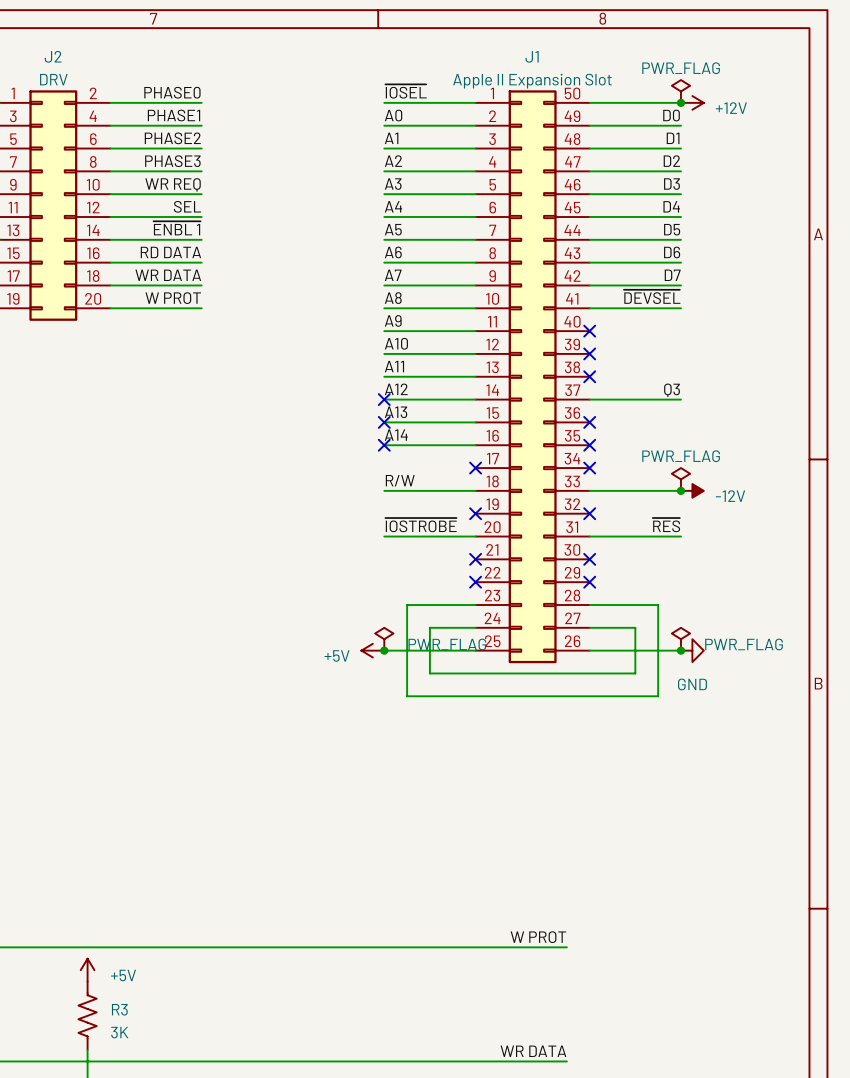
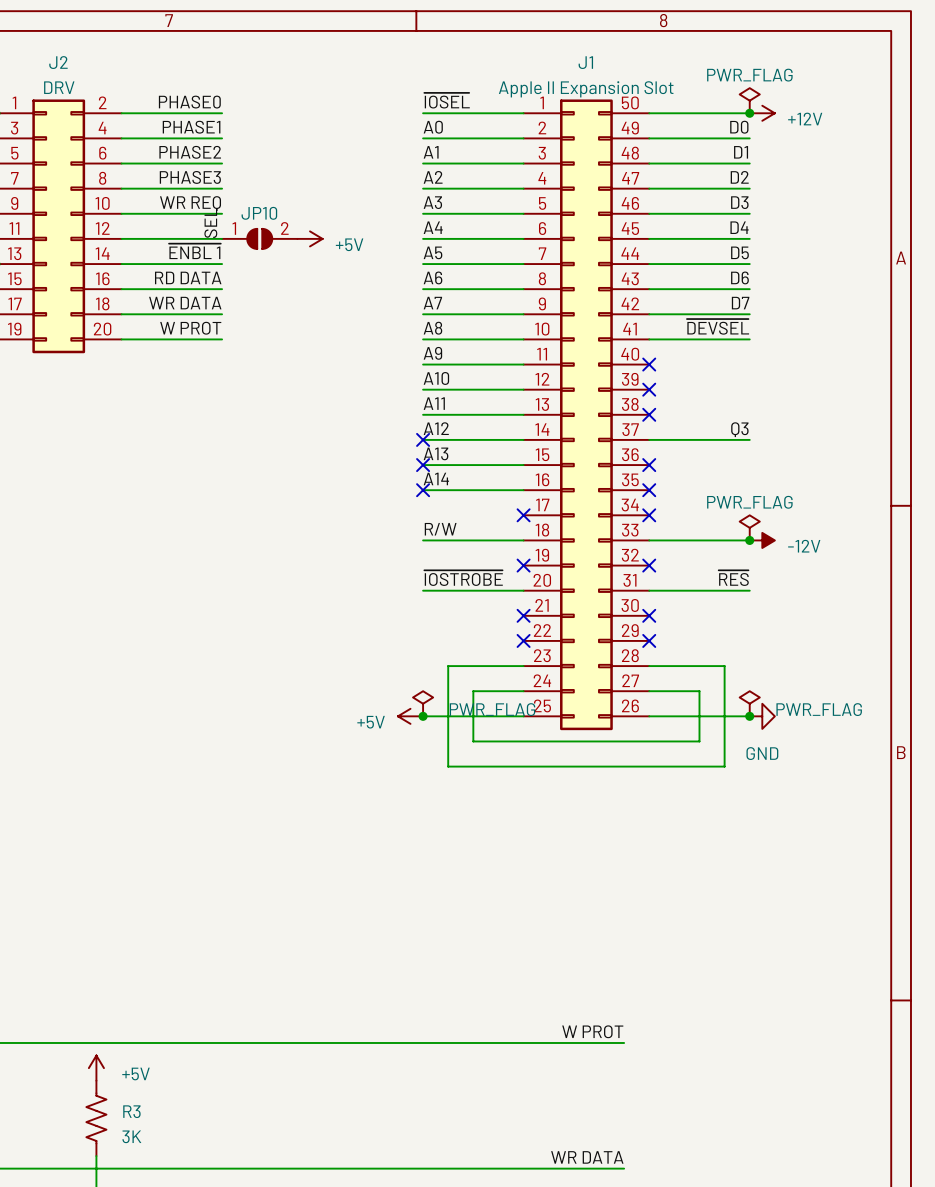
label rotation: 0° (187, 206) -> 90° counterclockwise (210, 223)
JP10: none -> (259, 238)
power symbol: none -> +5V (310, 238)

